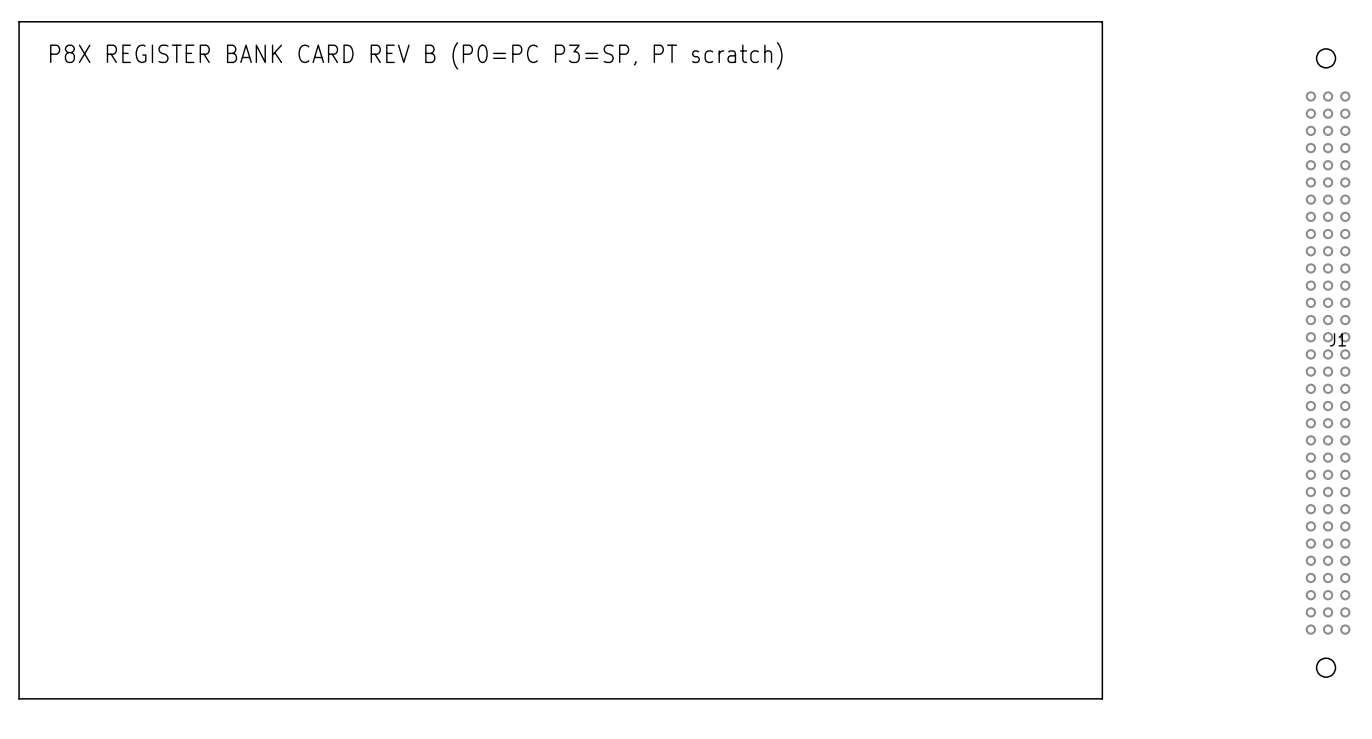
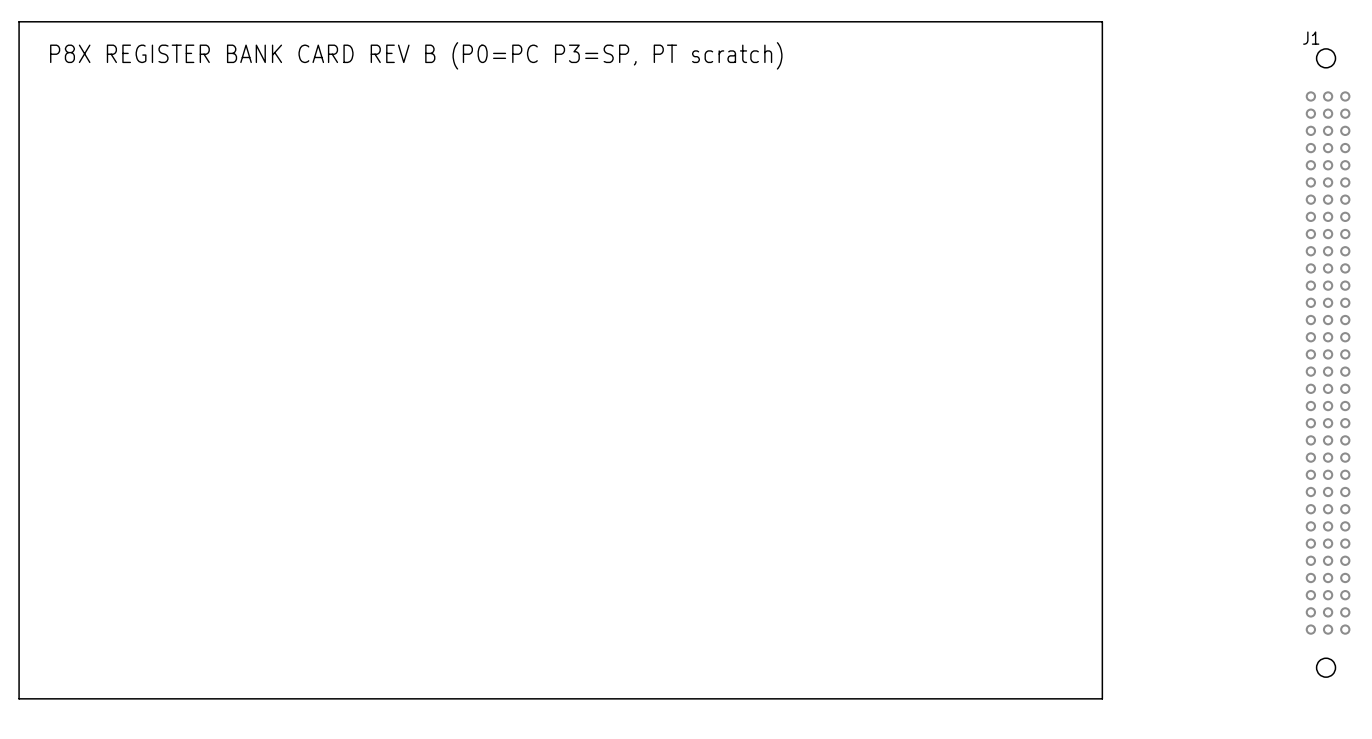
J1 name position: J1 (1337, 339) -> J1 (1311, 38)

